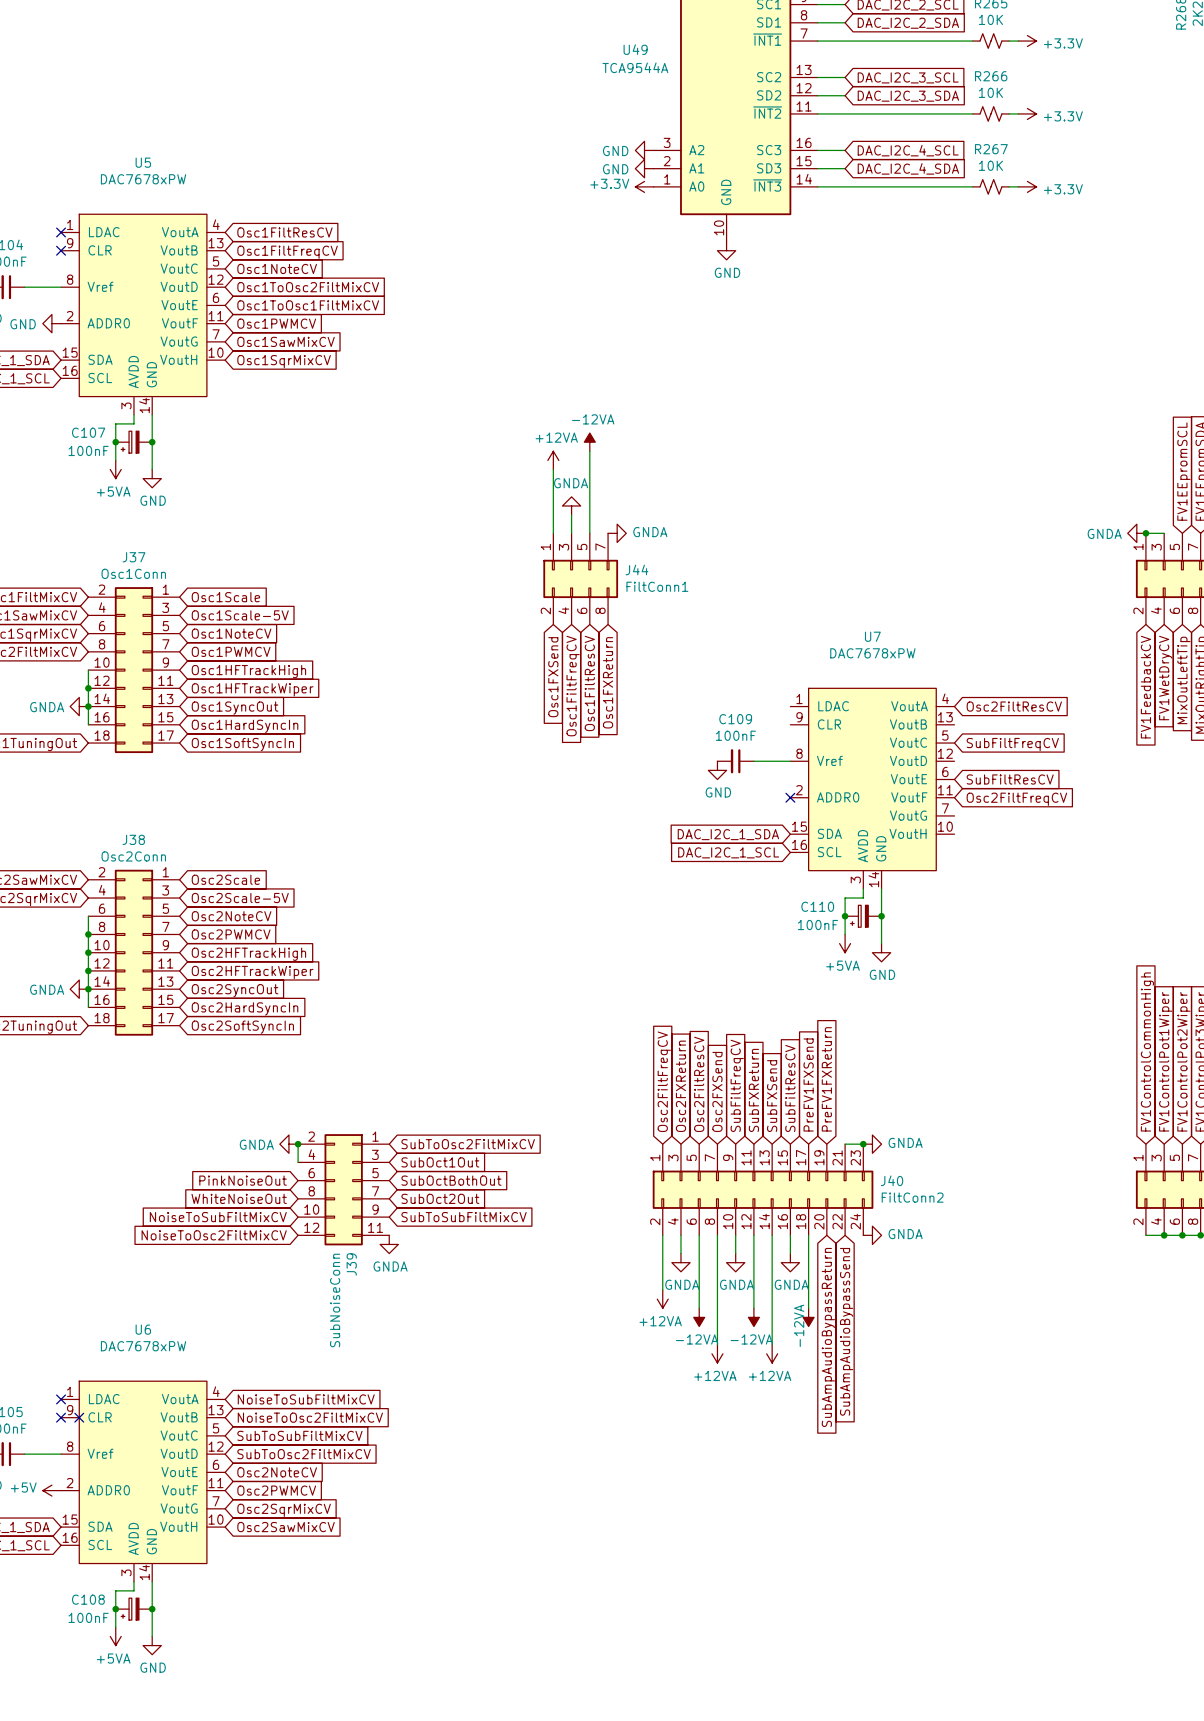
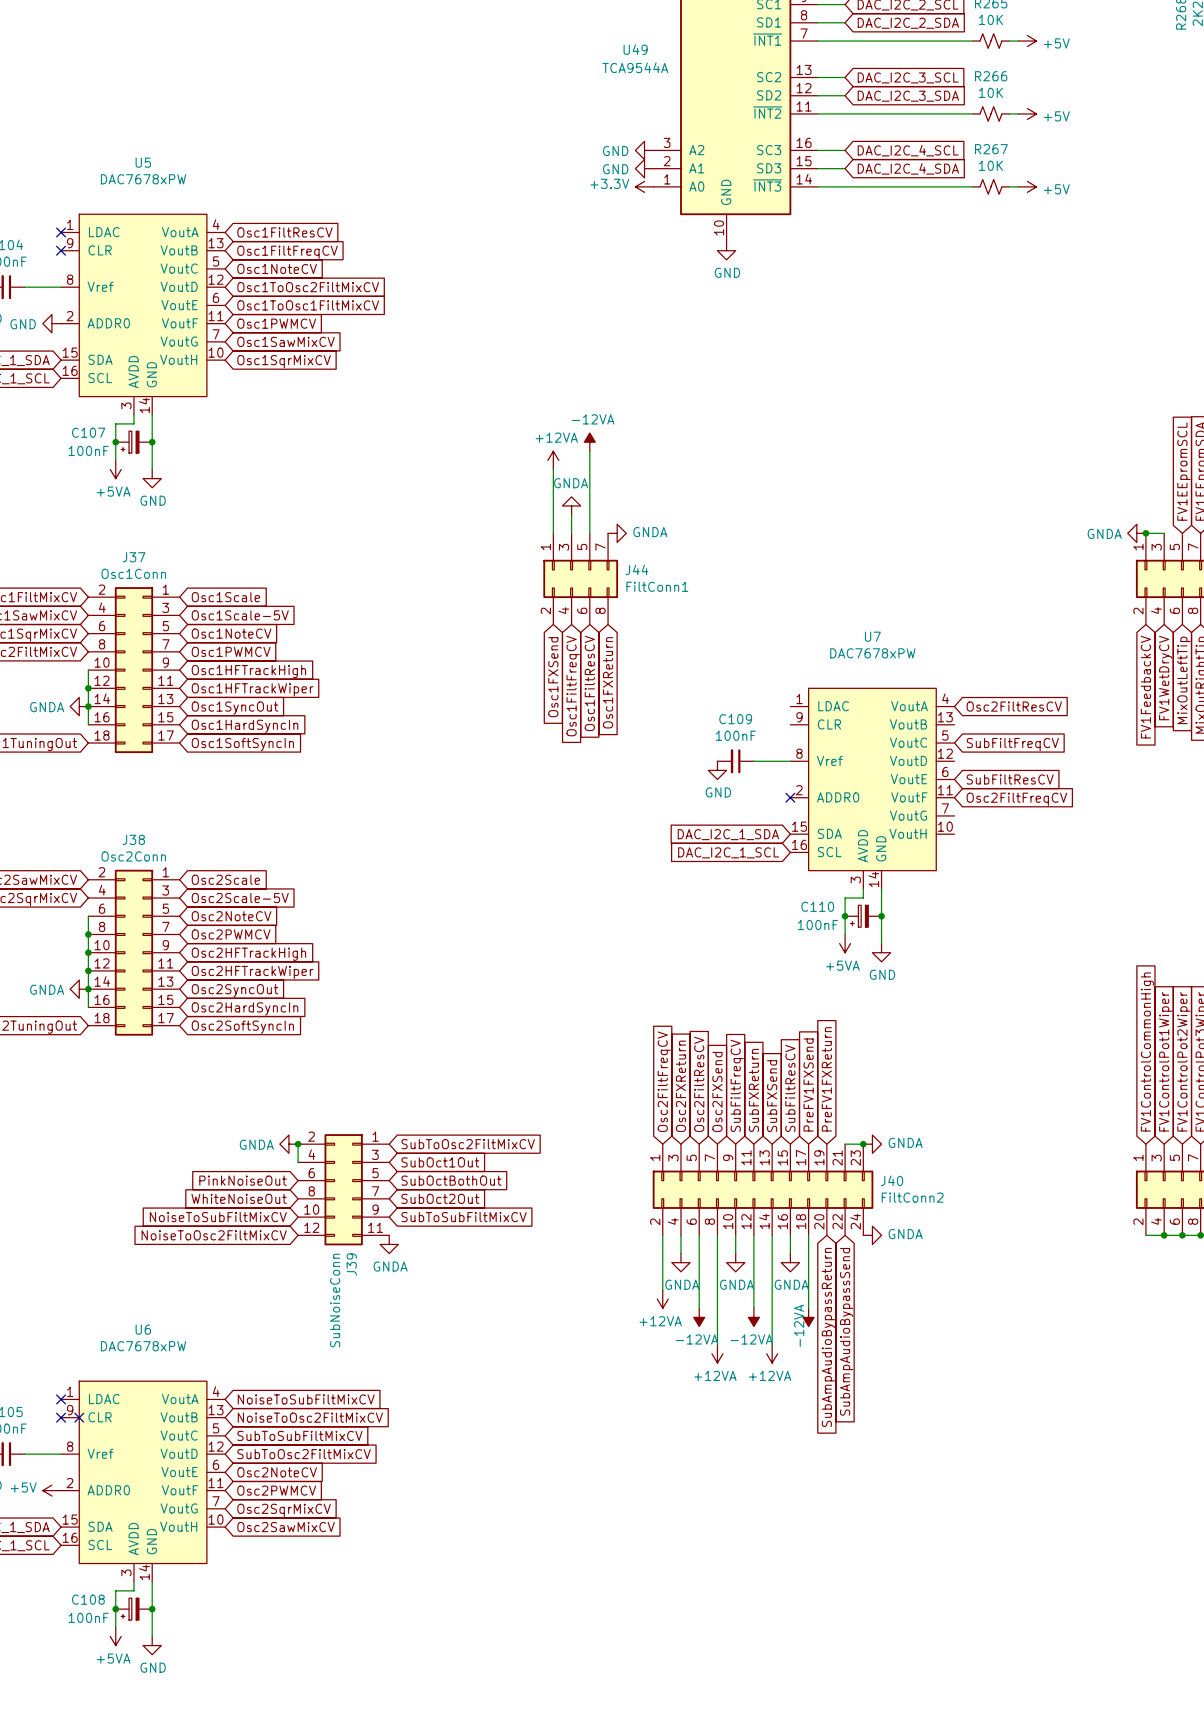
power symbol: +3.3V (1027, 41) -> +5V (1027, 41)
power symbol: +3.3V (1027, 113) -> +5V (1027, 113)
power symbol: +3.3V (1027, 186) -> +5V (1027, 186)

